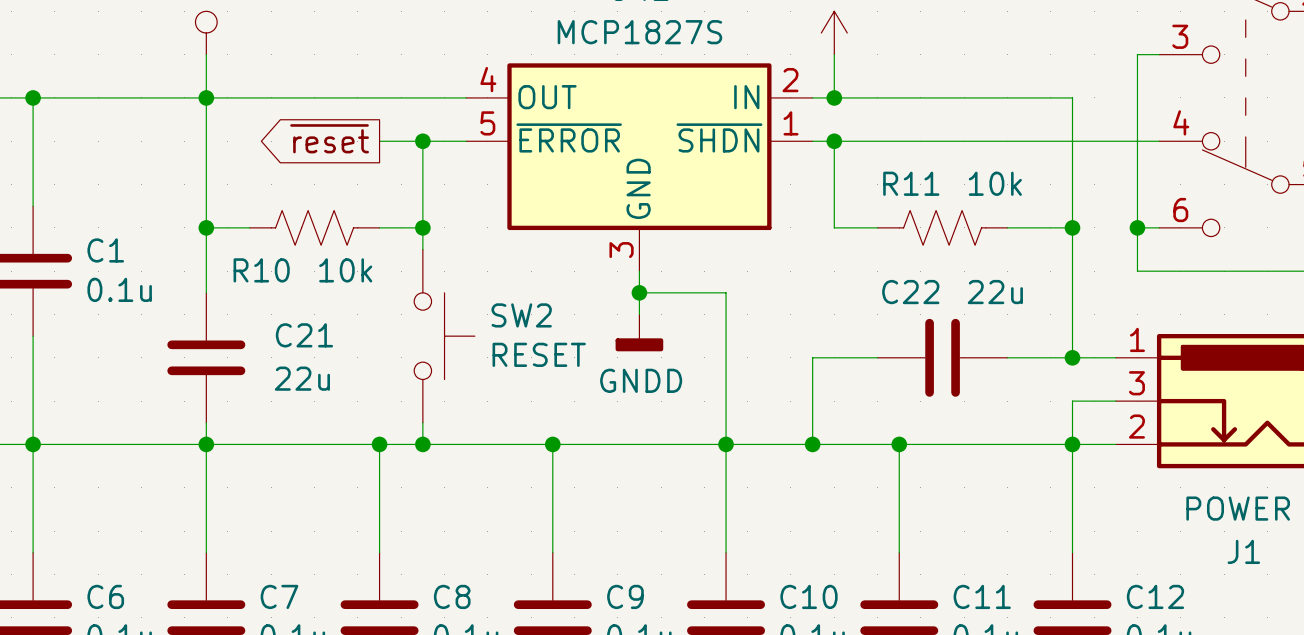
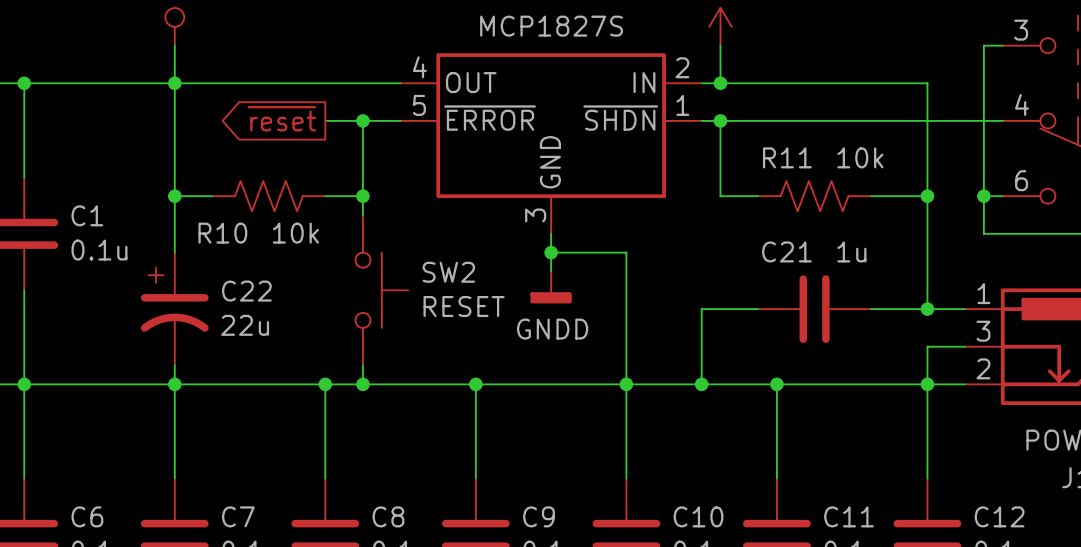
C22 name: C22 (910, 292) -> C21 (786, 251)
C22 value: 22u (995, 292) -> 1u (851, 251)
C21: 22u (206, 357) -> none
C22: none -> 22u (174, 309)

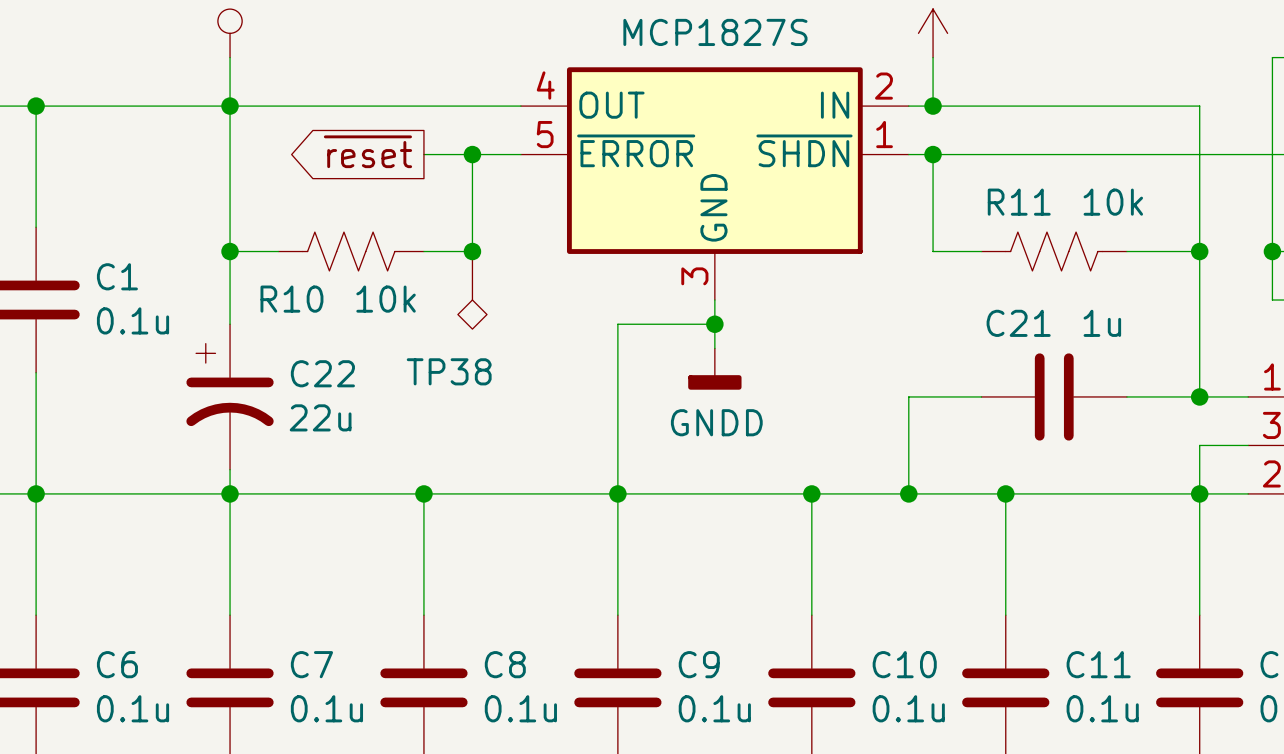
TP38: none -> (472, 290)
wire: (551, 252) (626, 252) (626, 384) -> (714, 324) (617, 324) (617, 493)
SW2: RESET (381, 290) -> none
wire: (362, 365) (362, 384) -> none
junction: (362, 384) -> none

